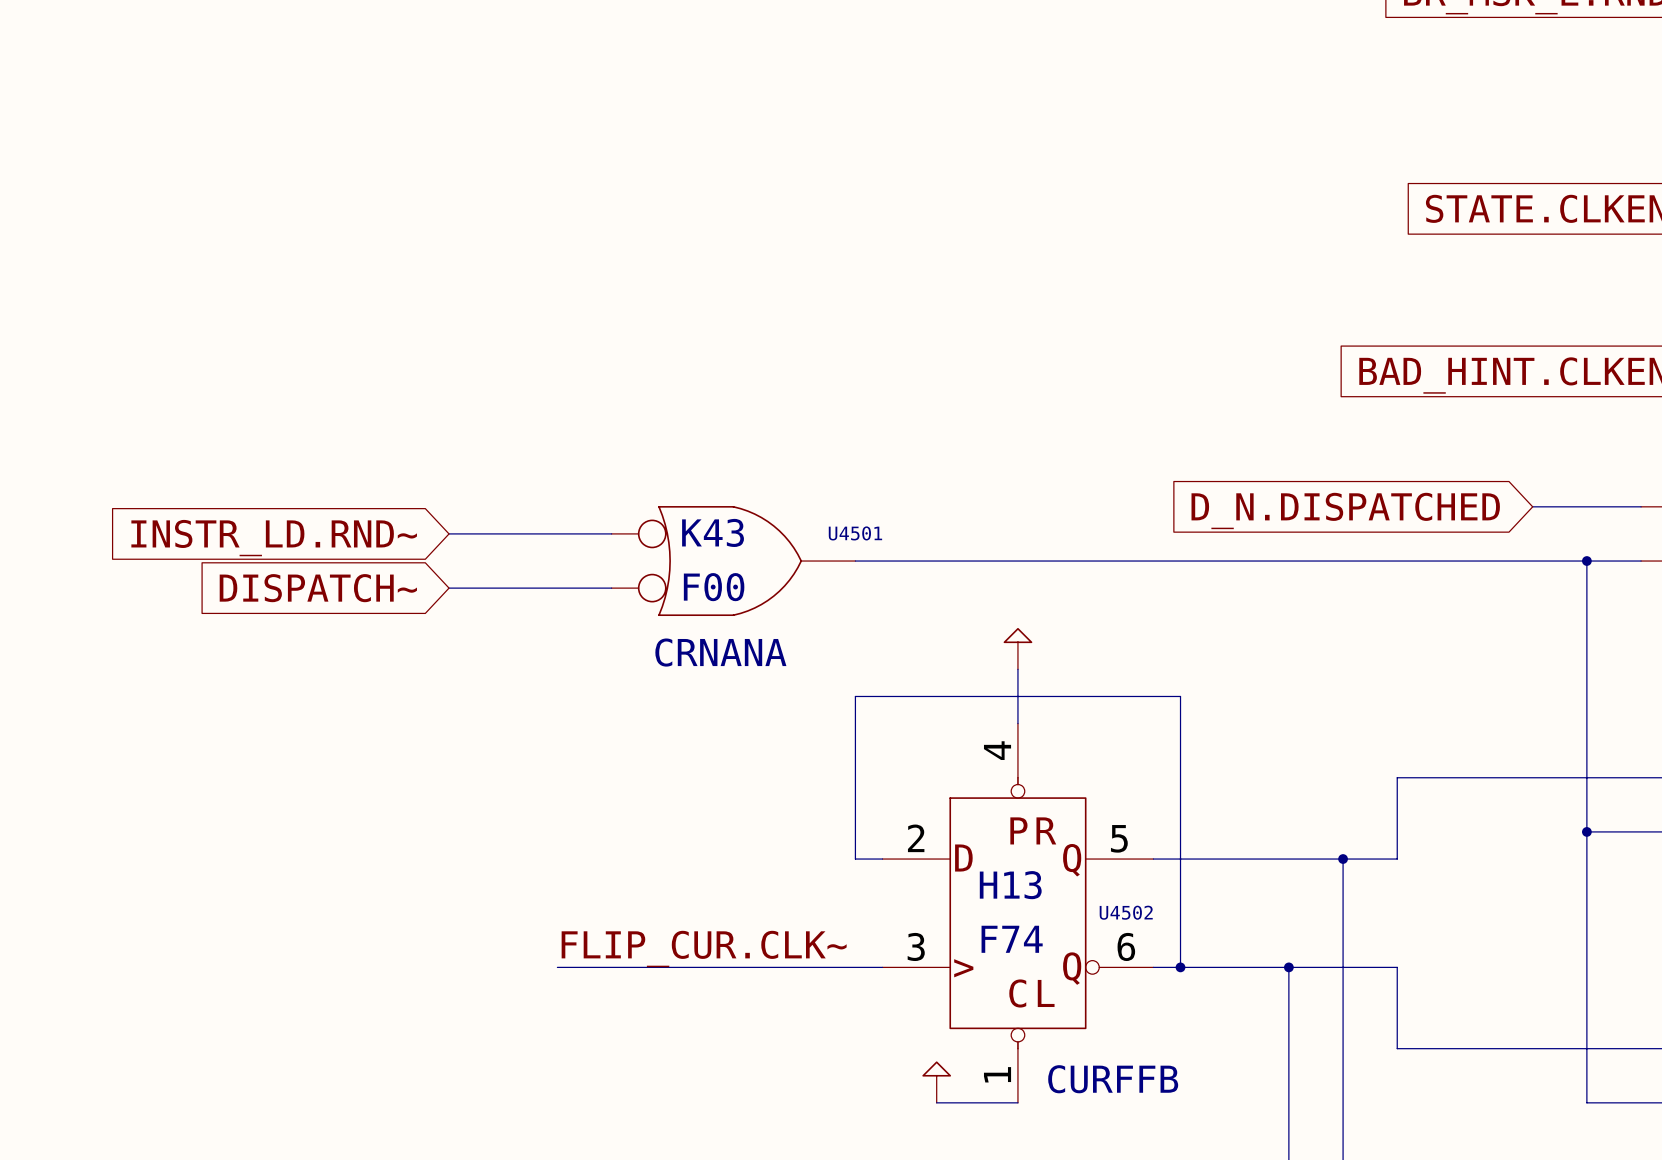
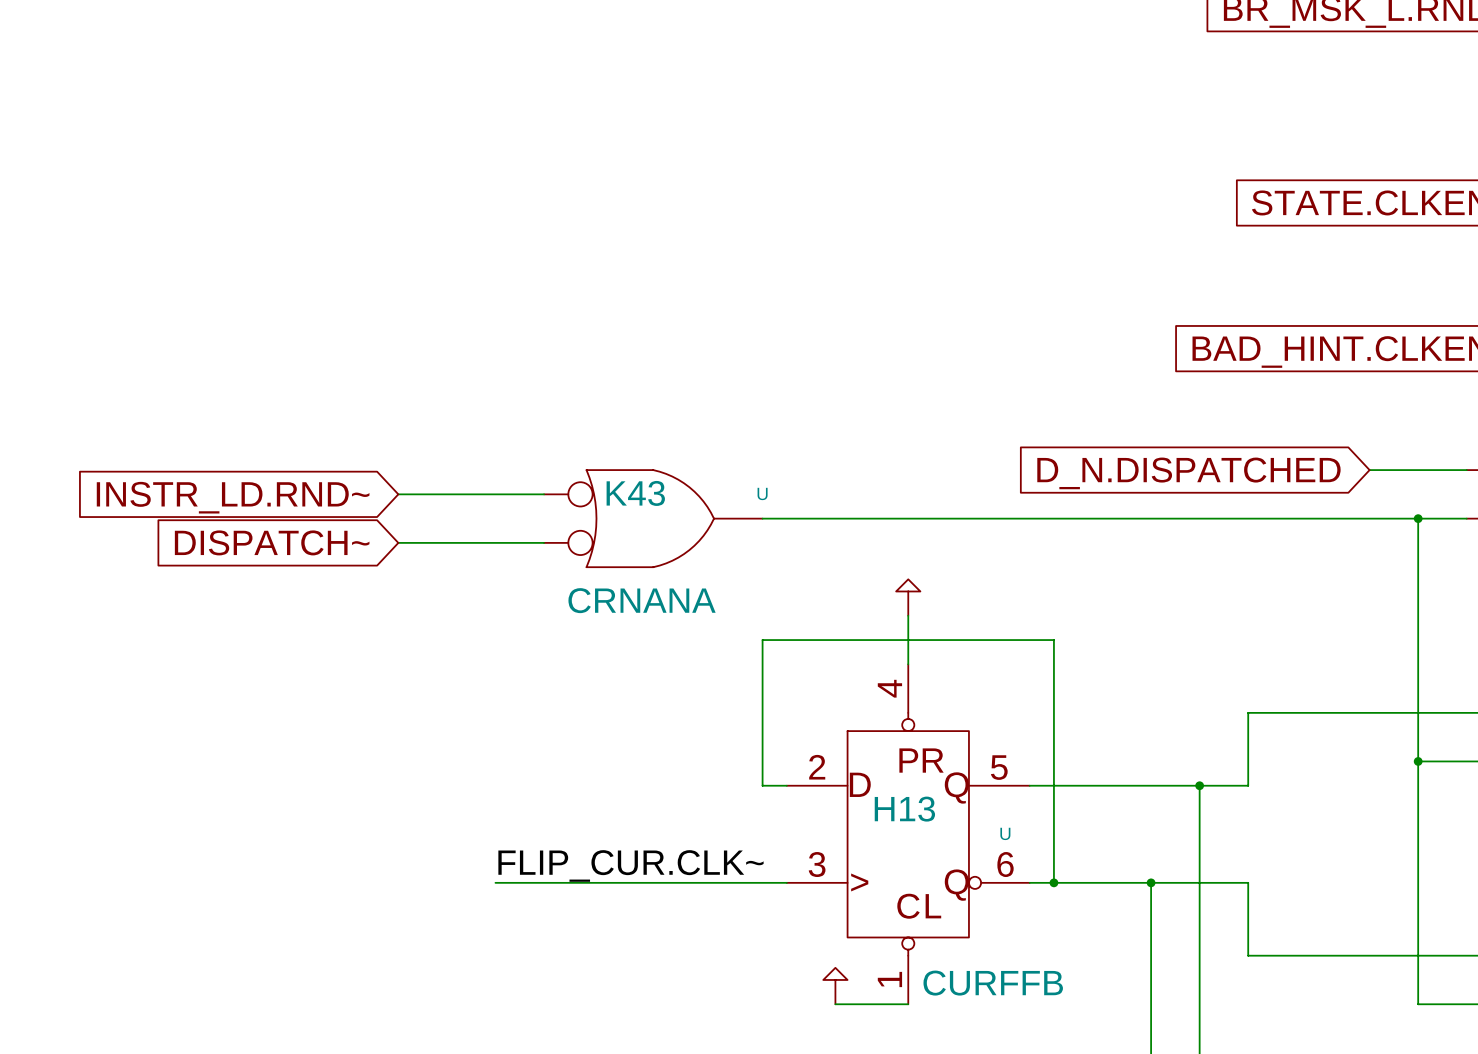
U4501 name: U4501 (855, 533) -> U (762, 493)
U4501 value: F00 (714, 587) -> none
U4502 name: U4502 (1126, 912) -> U (1005, 833)
U4502 value: F74 (1012, 939) -> none

